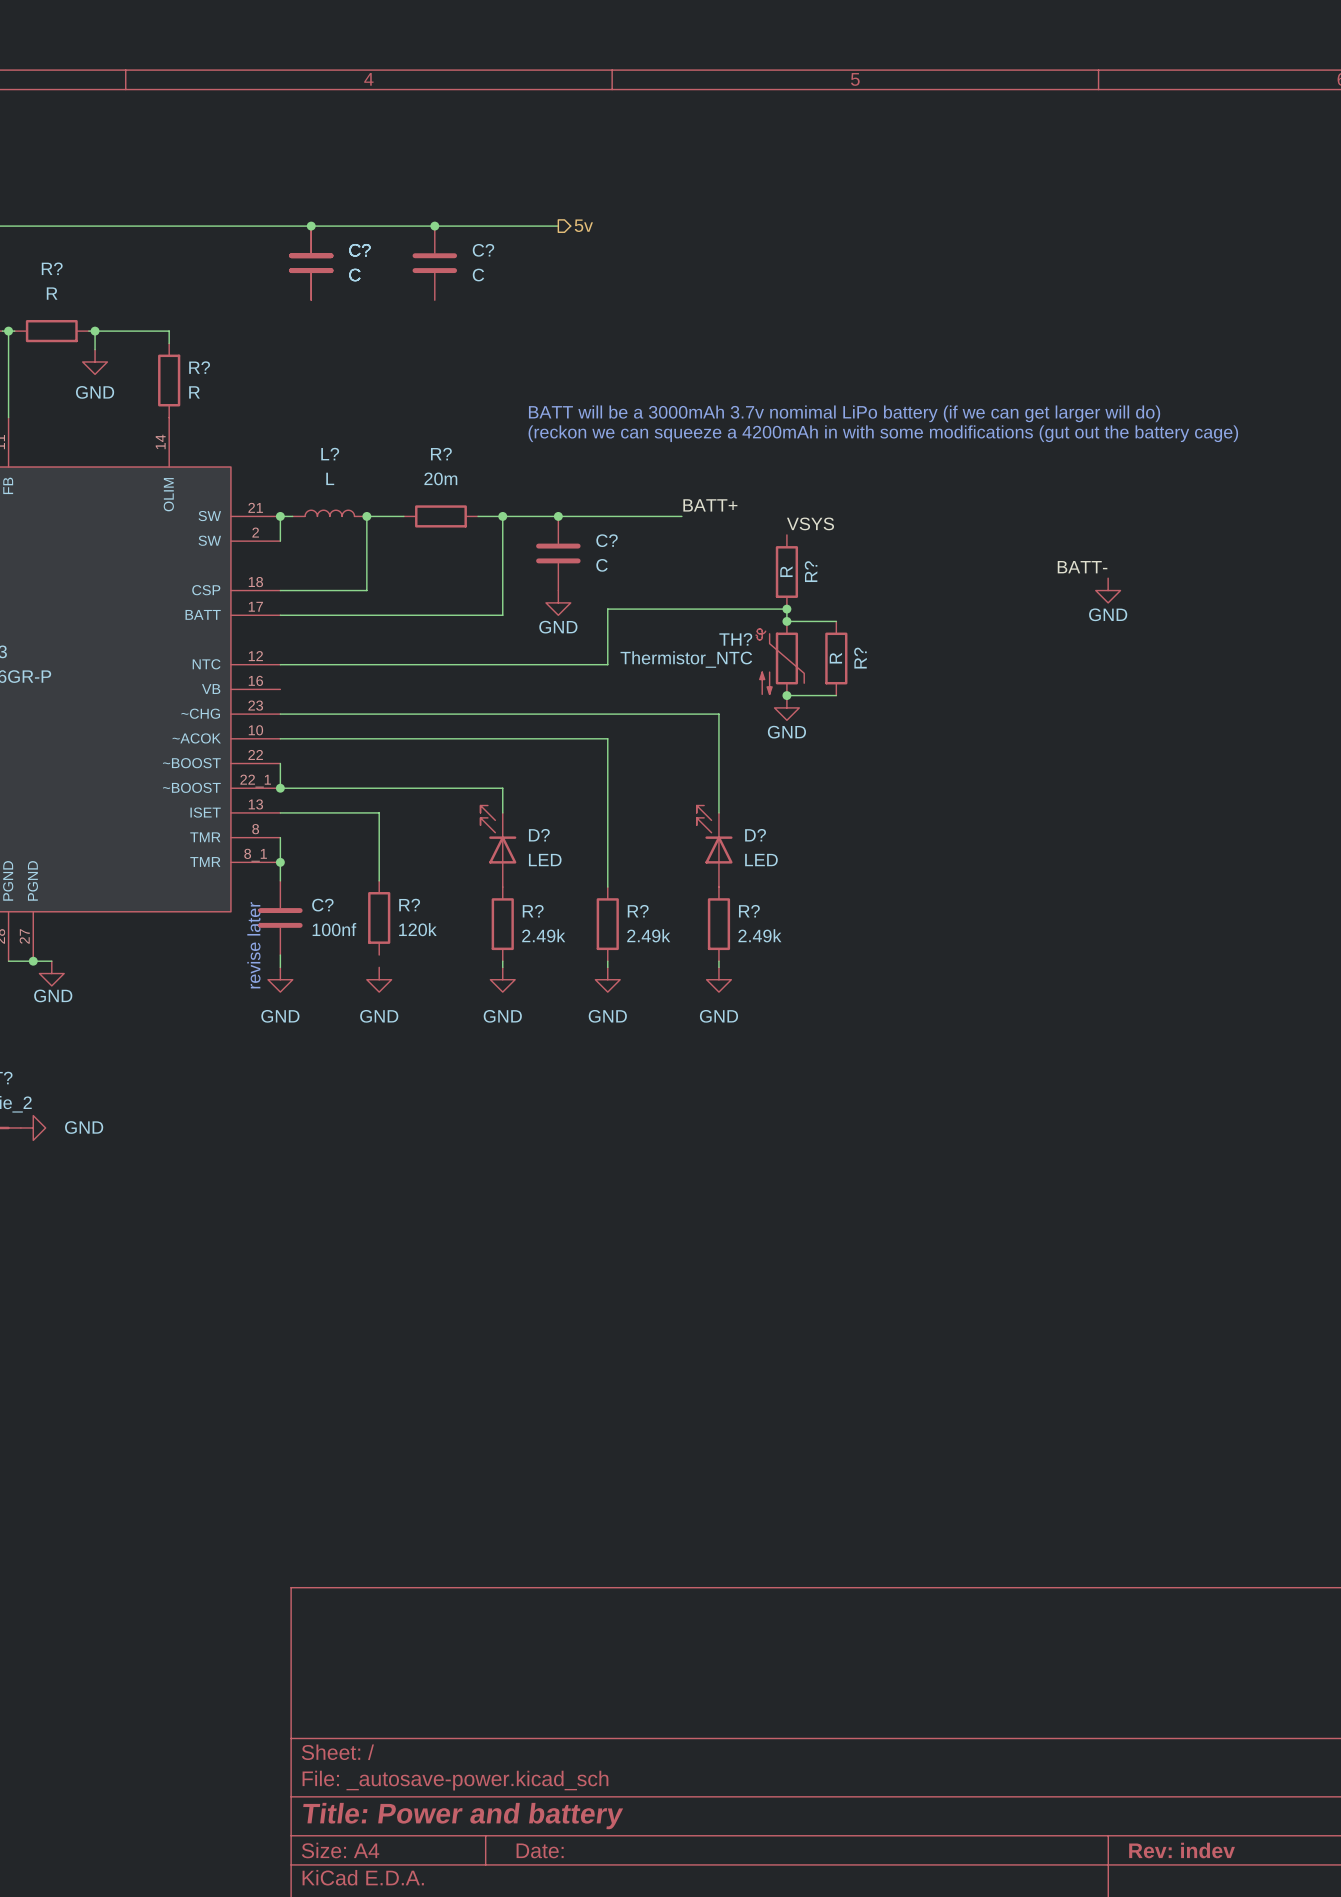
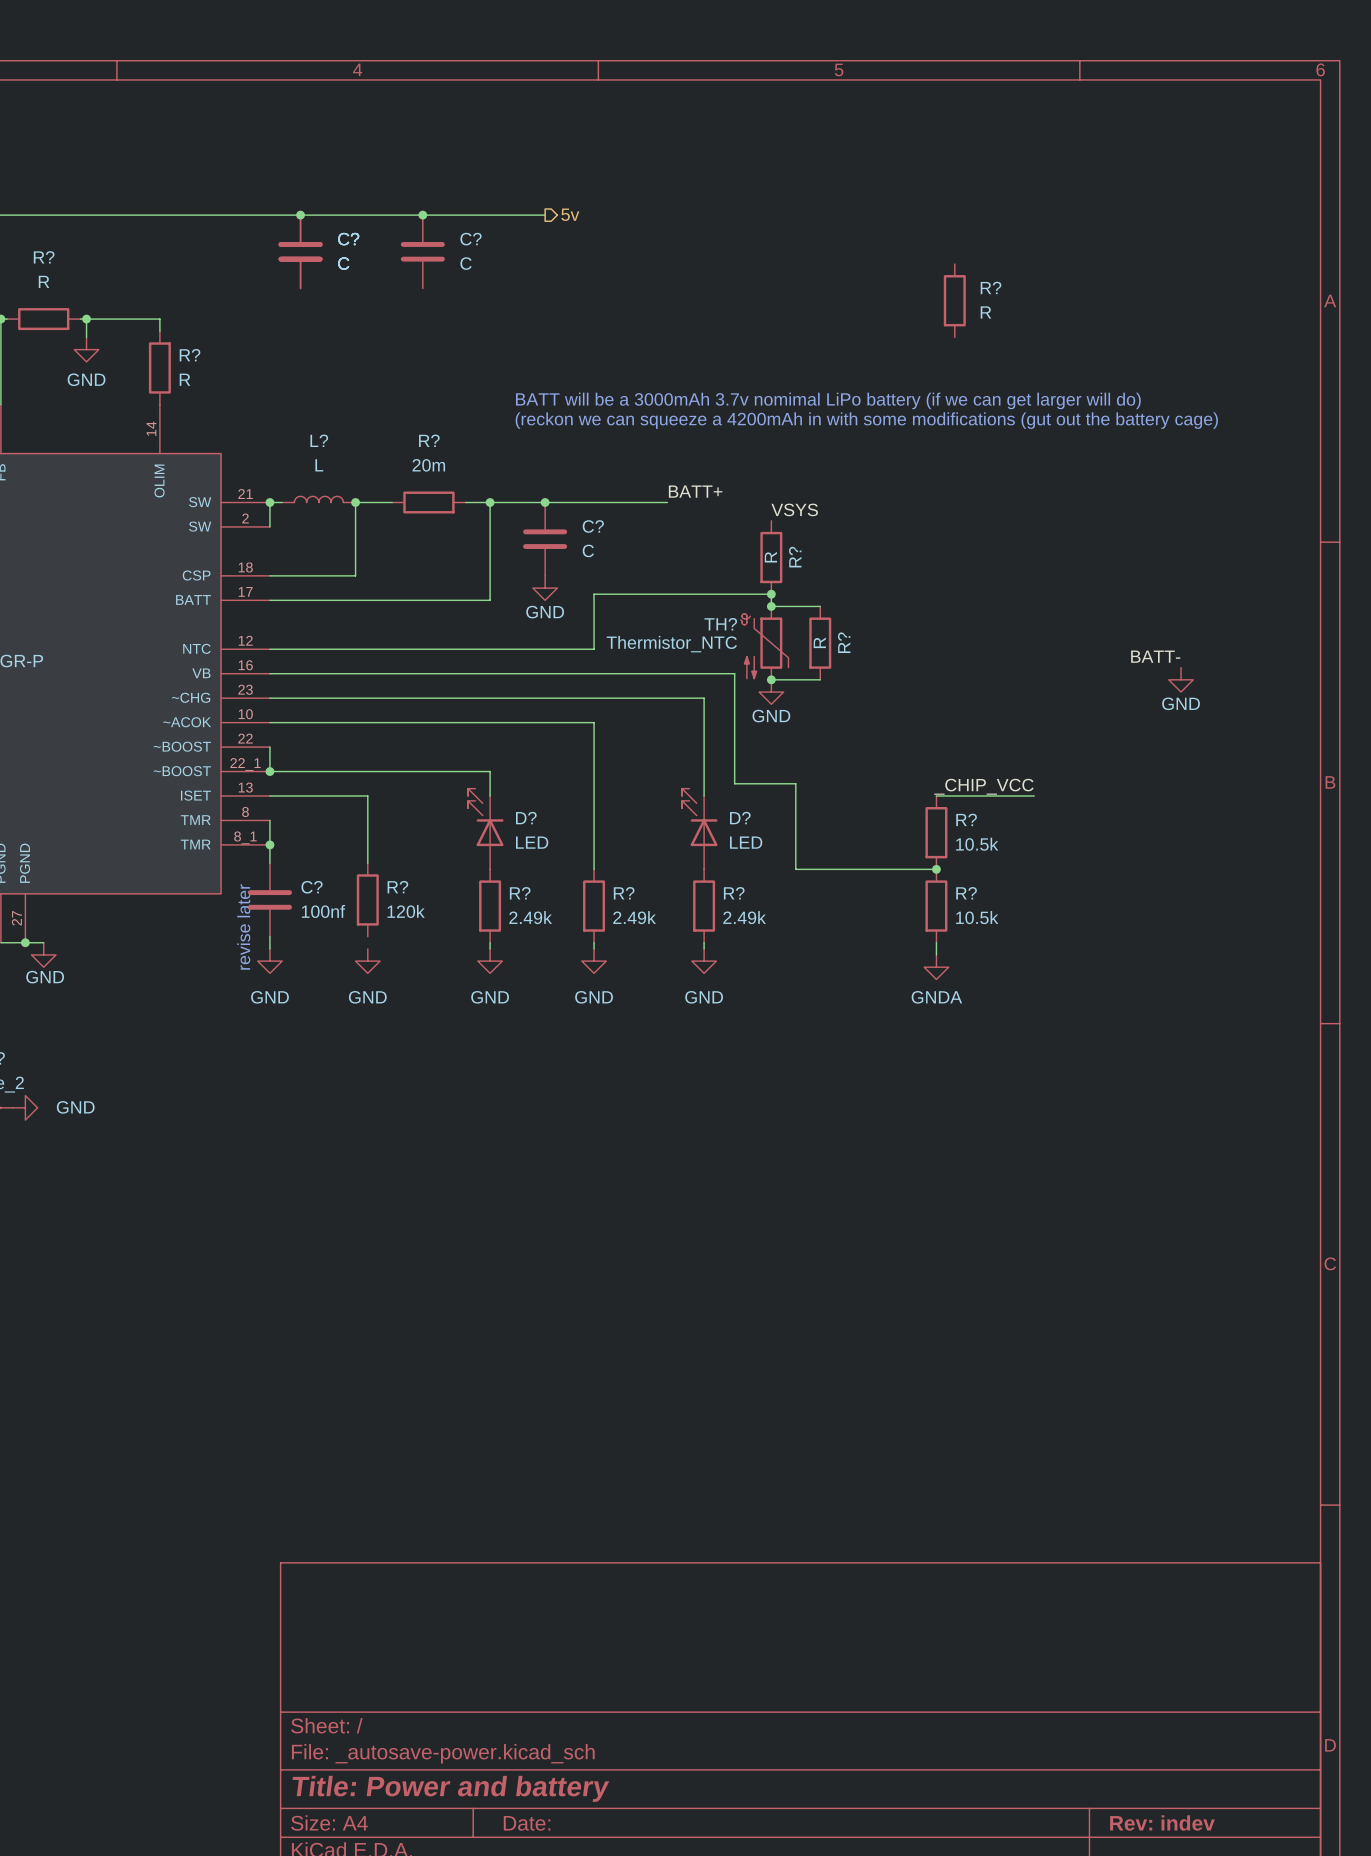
R?: none -> R (954, 300)
label position: BATT- (1082, 567) -> BATT- (1155, 656)
power symbol position: GND (1108, 590) -> GND (1181, 679)
wire: none -> (269, 673) (734, 673) (734, 783) (795, 783) (795, 869) (936, 869)
label: none -> _CHIP_VCC (983, 786)
wire: none -> (936, 795) (1034, 795)
R?: none -> 10.5k (936, 832)
junction: none -> (936, 869)
R?: none -> 10.5k (936, 906)
wire: none -> (936, 942) (936, 954)
power symbol: none -> GNDA (936, 967)

